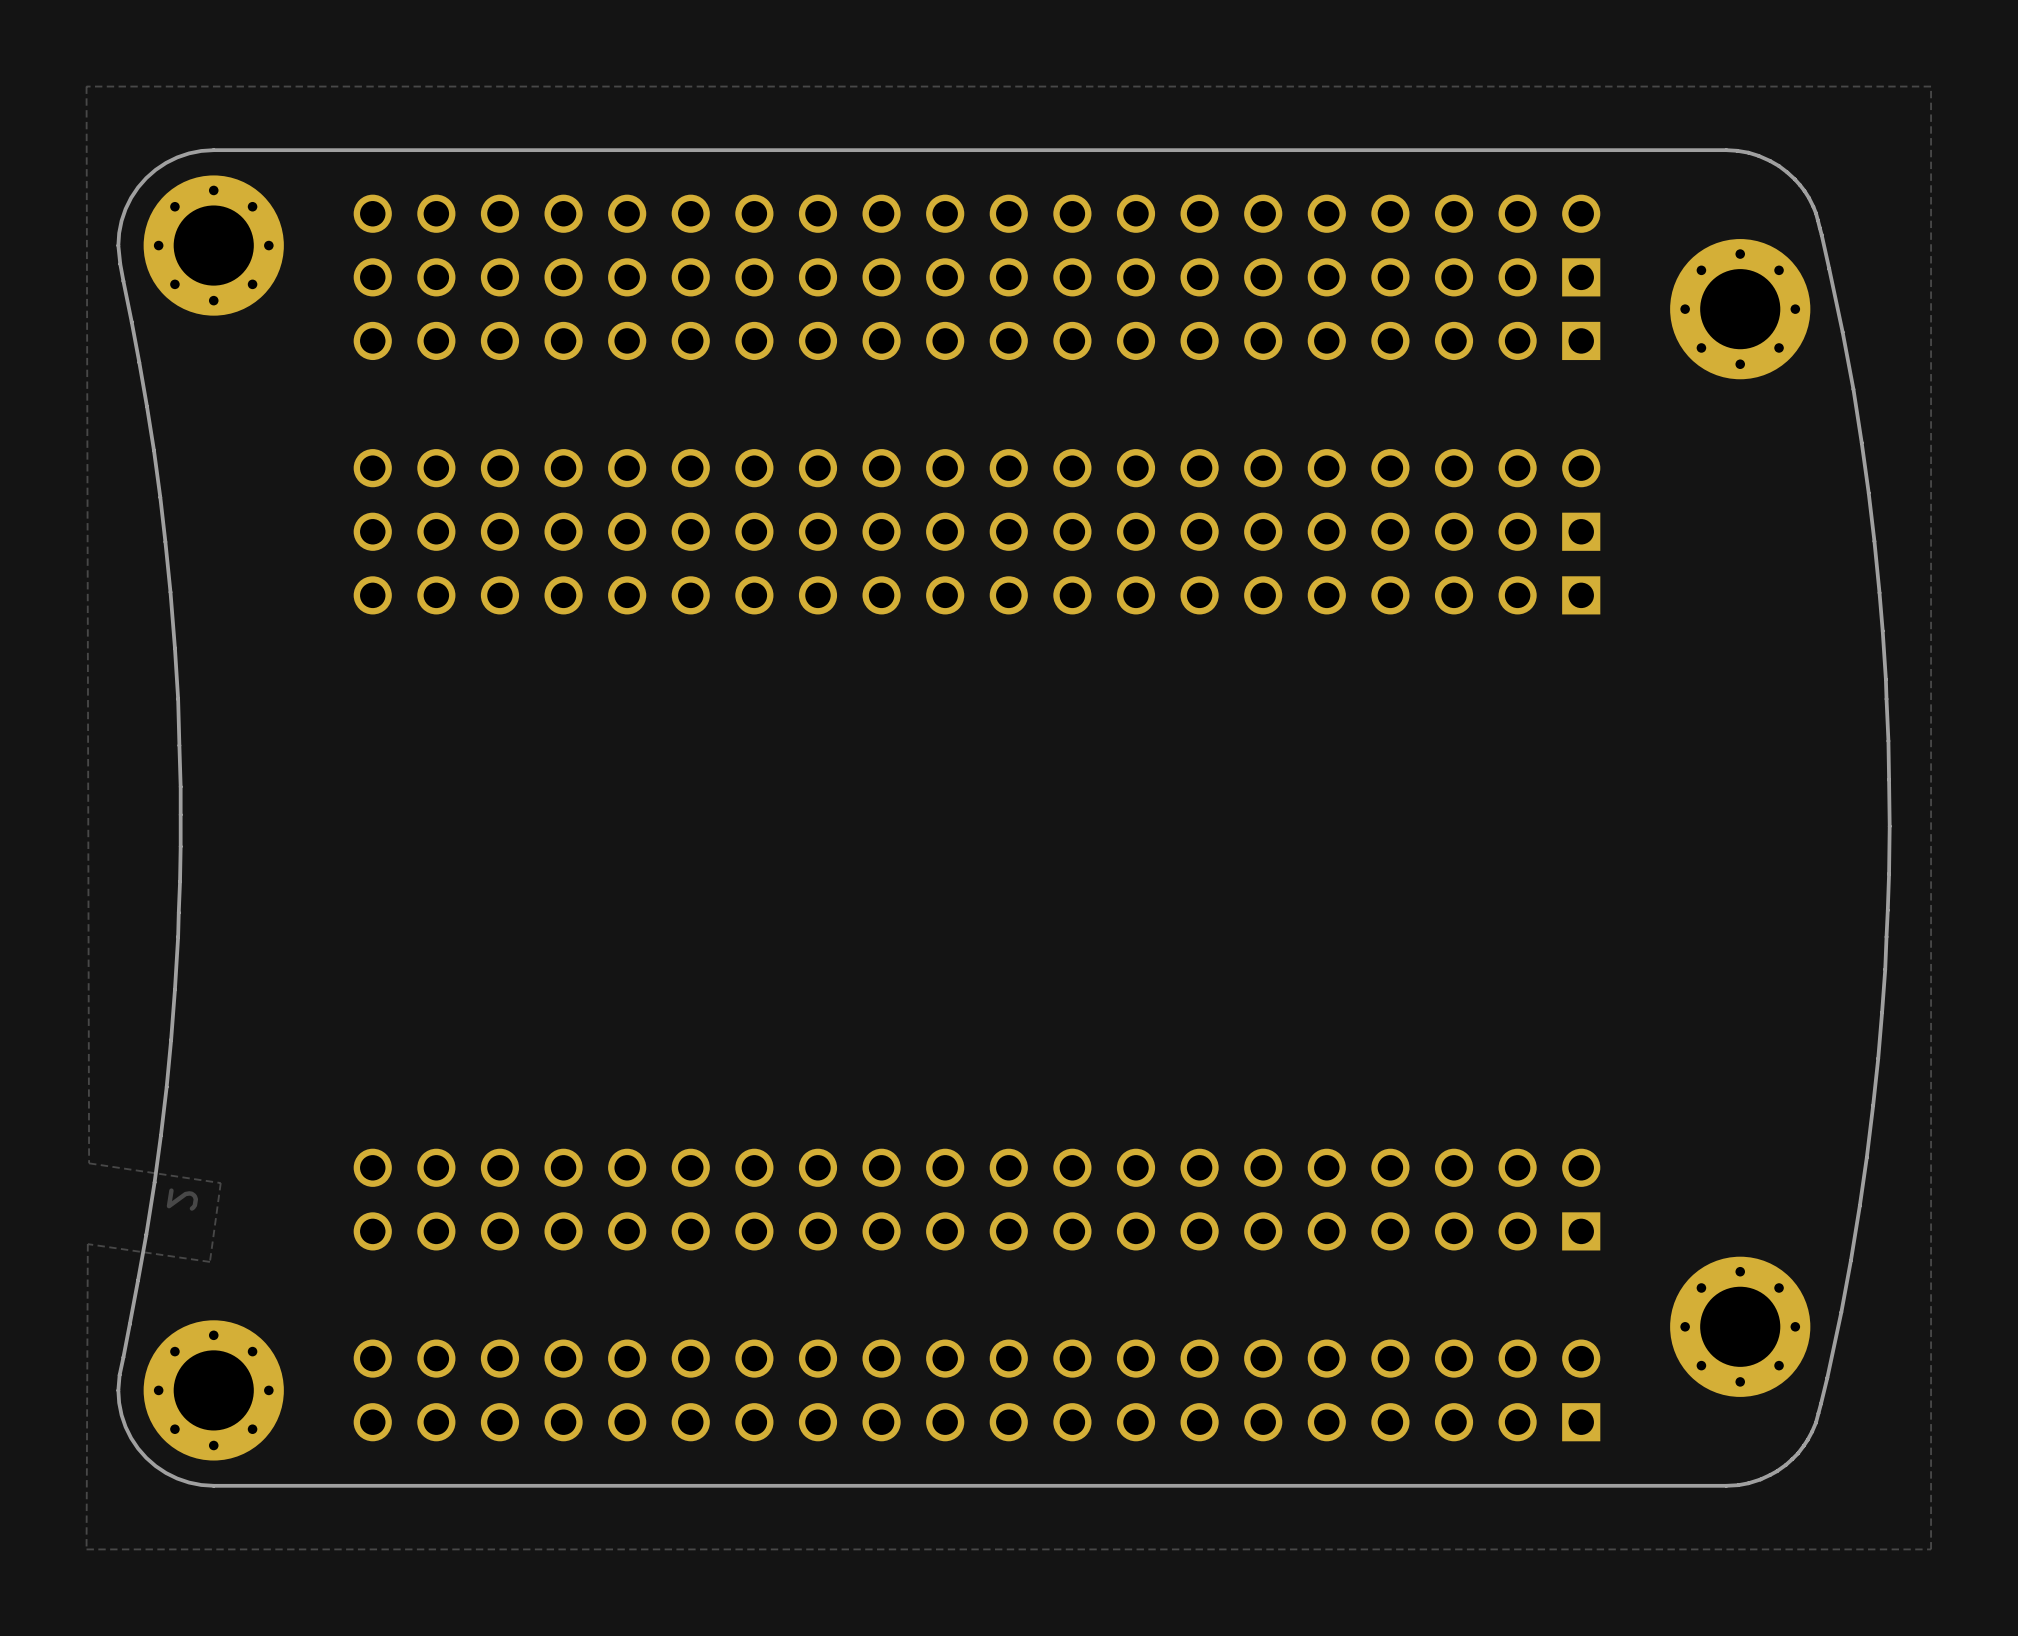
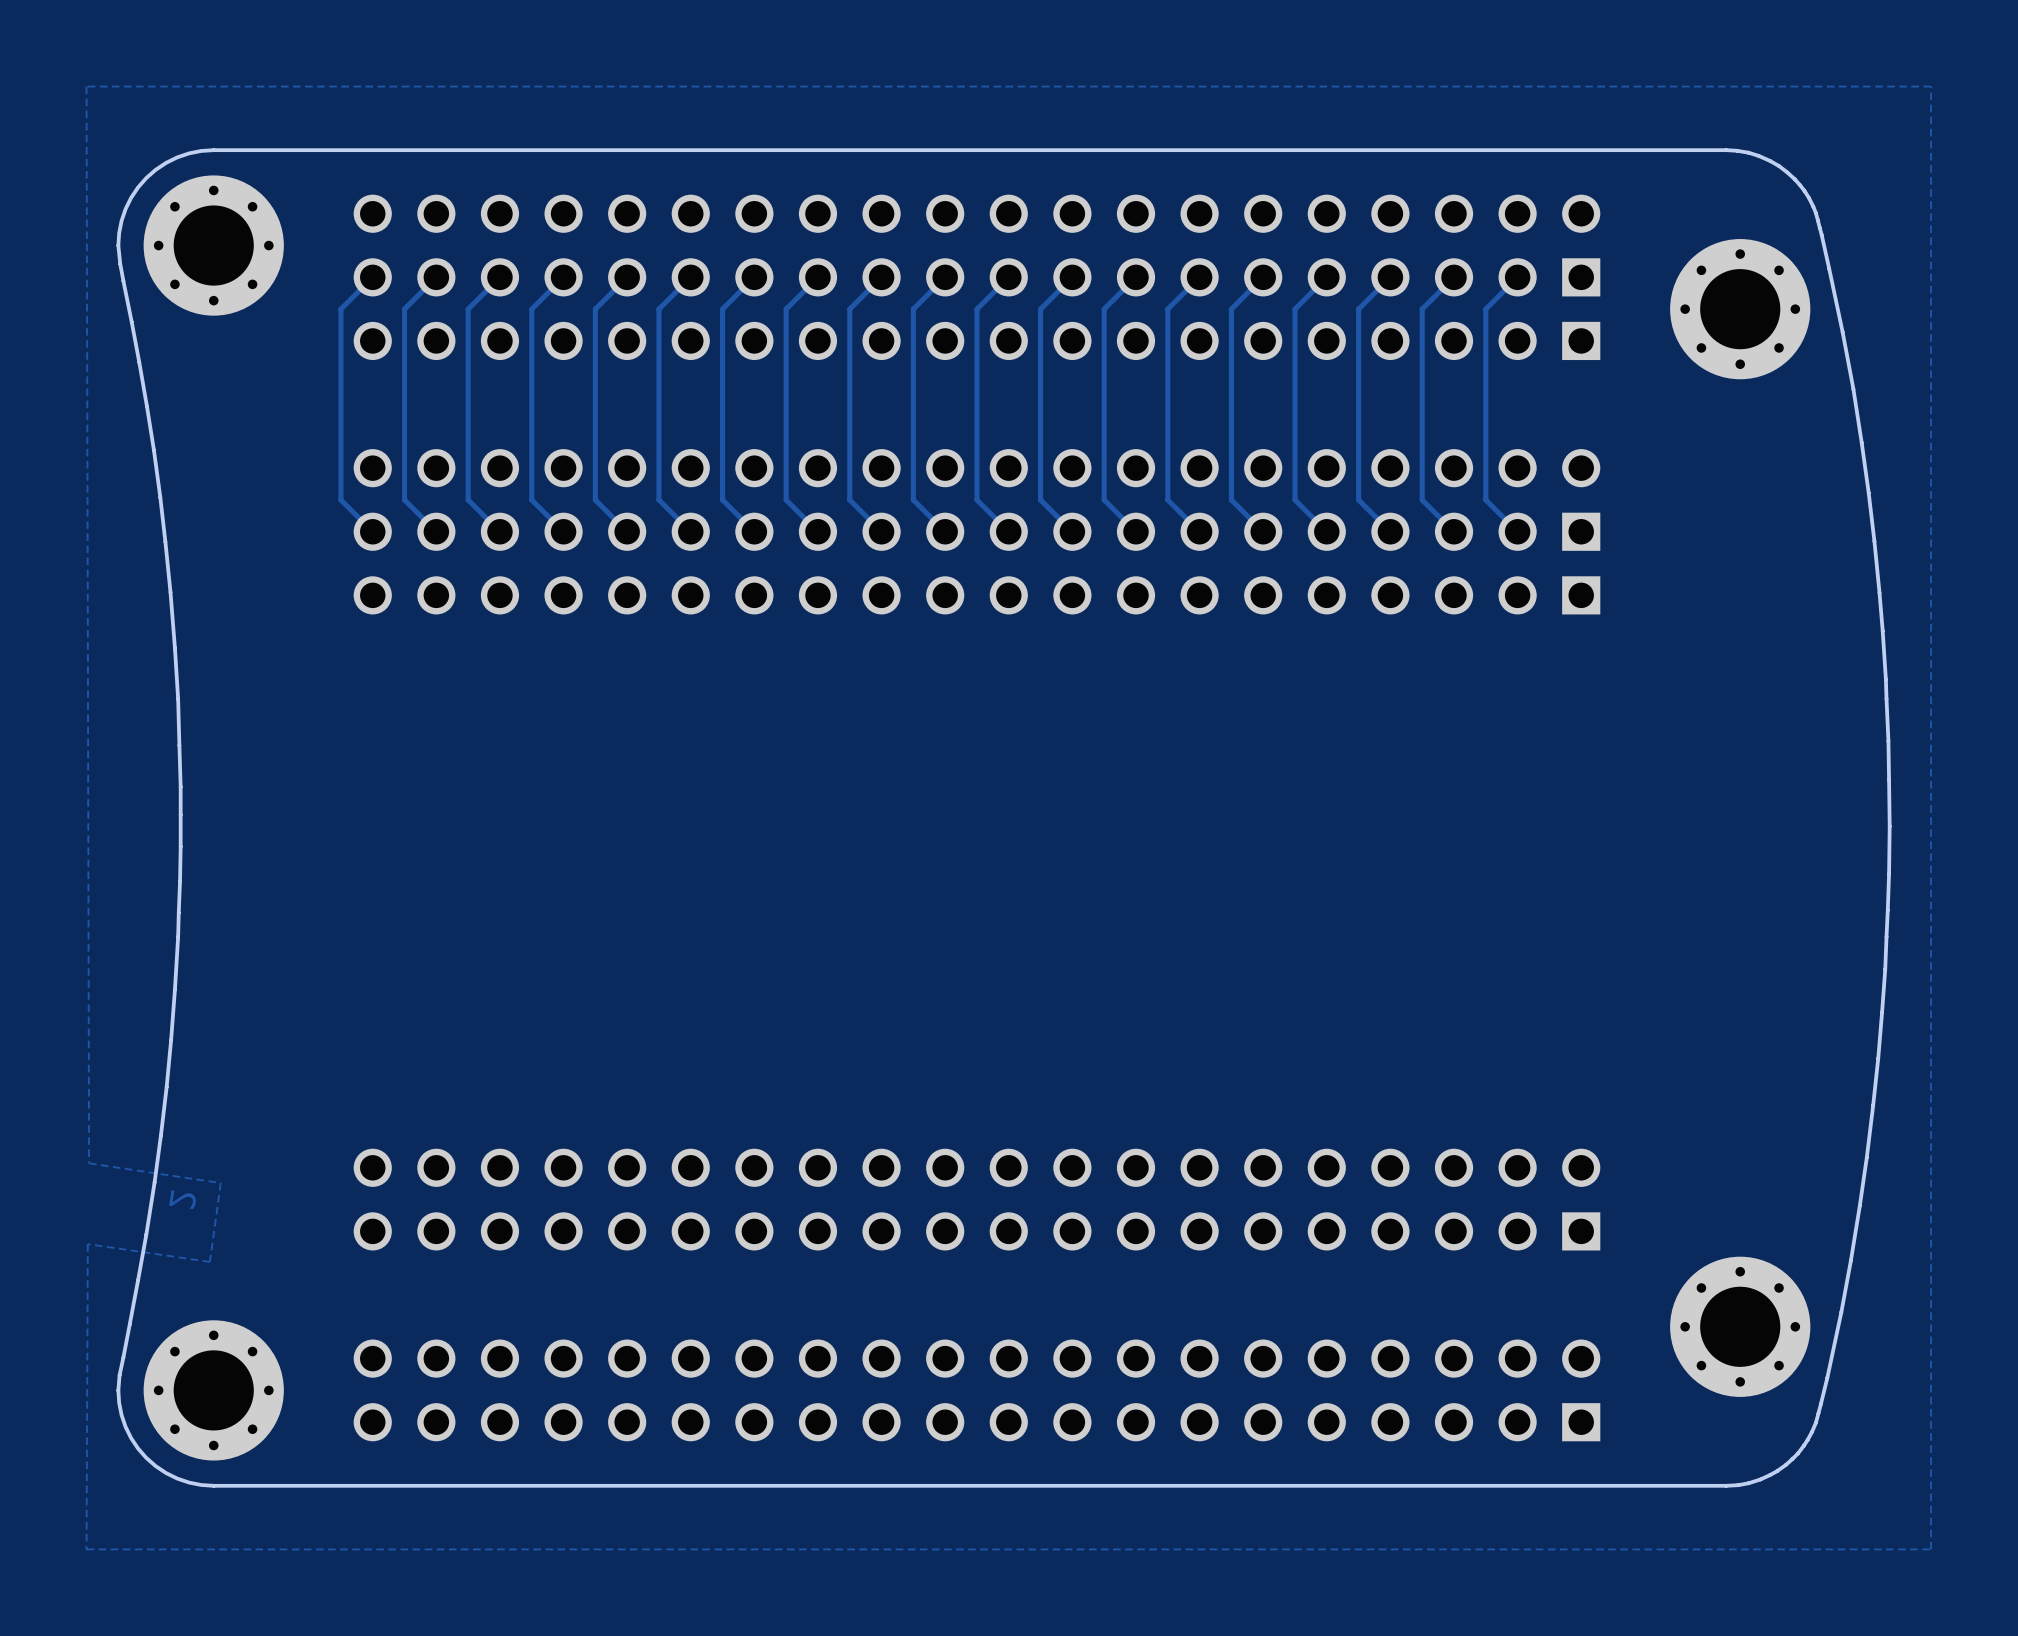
track: none -> (372, 277) (340, 309) (340, 499) (372, 531)
track: none -> (436, 277) (404, 309) (404, 499) (436, 531)
track: none -> (499, 277) (468, 309) (468, 499) (499, 531)
track: none -> (563, 277) (531, 309) (531, 499) (563, 531)
track: none -> (627, 277) (595, 309) (595, 499) (627, 531)
track: none -> (690, 277) (658, 309) (658, 499) (690, 531)
track: none -> (754, 277) (722, 309) (722, 499) (754, 531)
track: none -> (817, 277) (786, 309) (786, 499) (817, 531)
track: none -> (881, 277) (849, 309) (849, 499) (881, 531)
track: none -> (945, 277) (913, 309) (913, 499) (945, 531)
track: none -> (1008, 277) (976, 309) (976, 499) (1008, 531)
track: none -> (1072, 277) (1040, 309) (1040, 499) (1072, 531)
track: none -> (1135, 277) (1104, 309) (1104, 499) (1135, 531)
track: none -> (1199, 277) (1167, 309) (1167, 499) (1199, 531)
track: none -> (1263, 277) (1231, 309) (1231, 499) (1263, 531)
track: none -> (1326, 277) (1295, 309) (1295, 499) (1326, 531)
track: none -> (1390, 277) (1358, 309) (1358, 499) (1390, 531)
track: none -> (1454, 277) (1422, 309) (1422, 499) (1454, 531)
track: none -> (1517, 277) (1485, 309) (1485, 499) (1517, 531)

